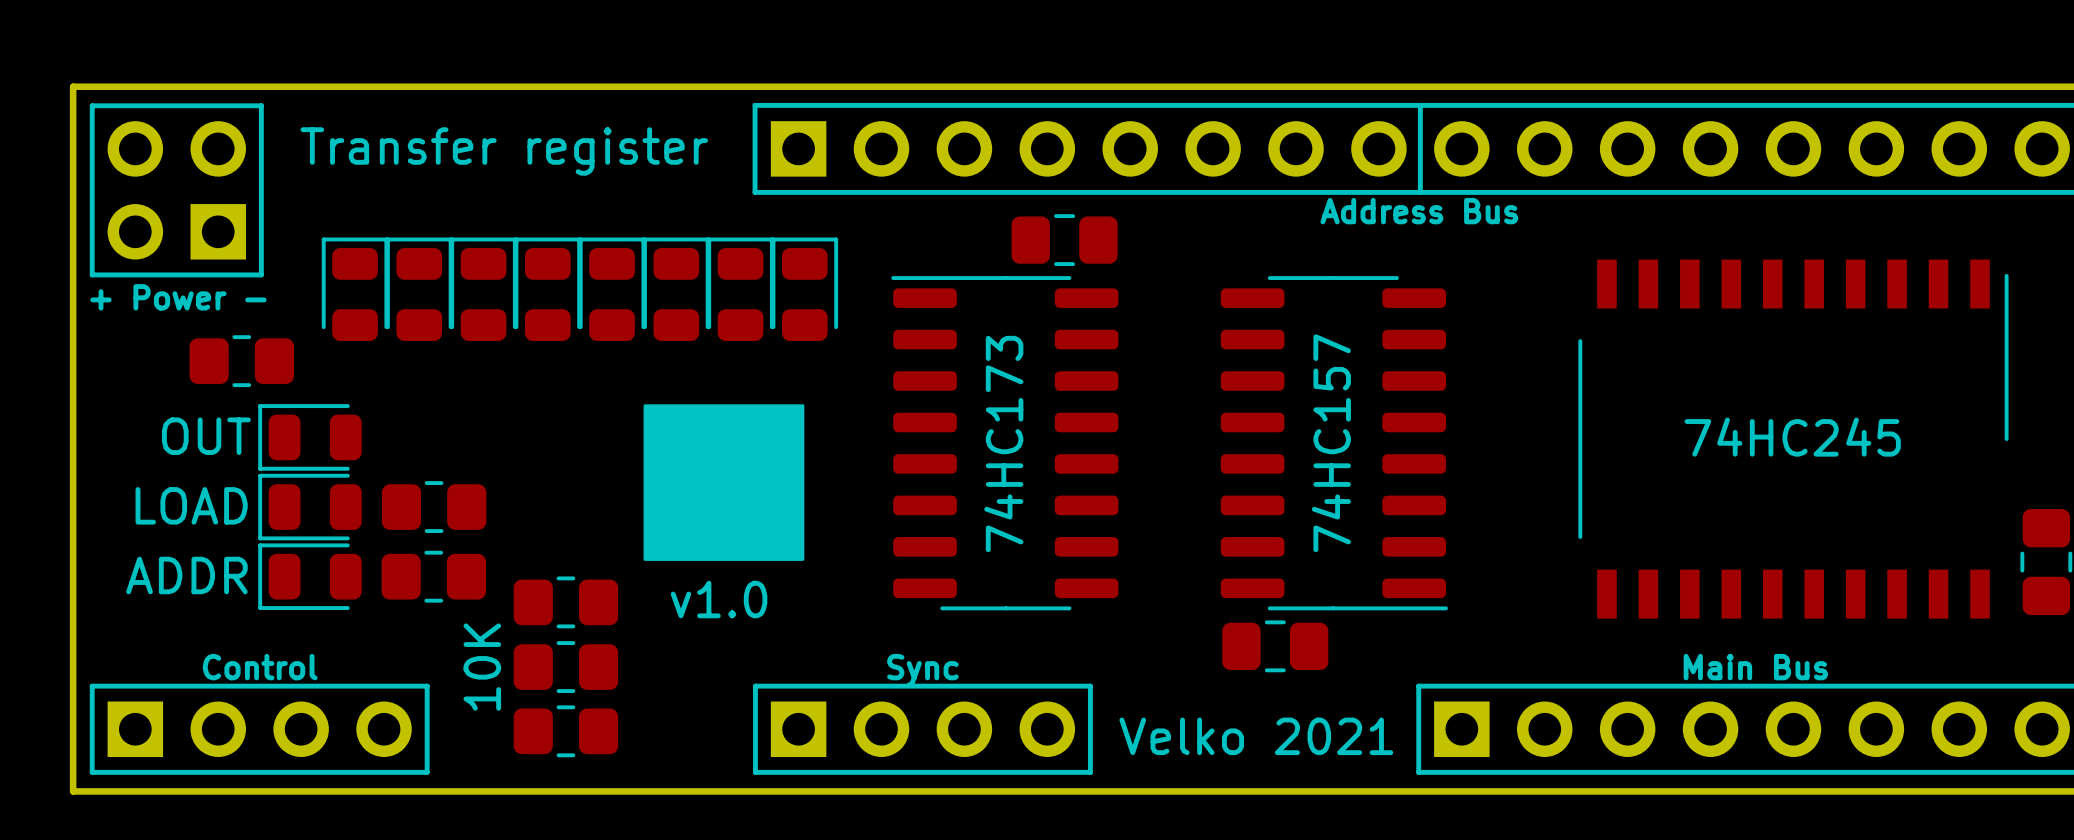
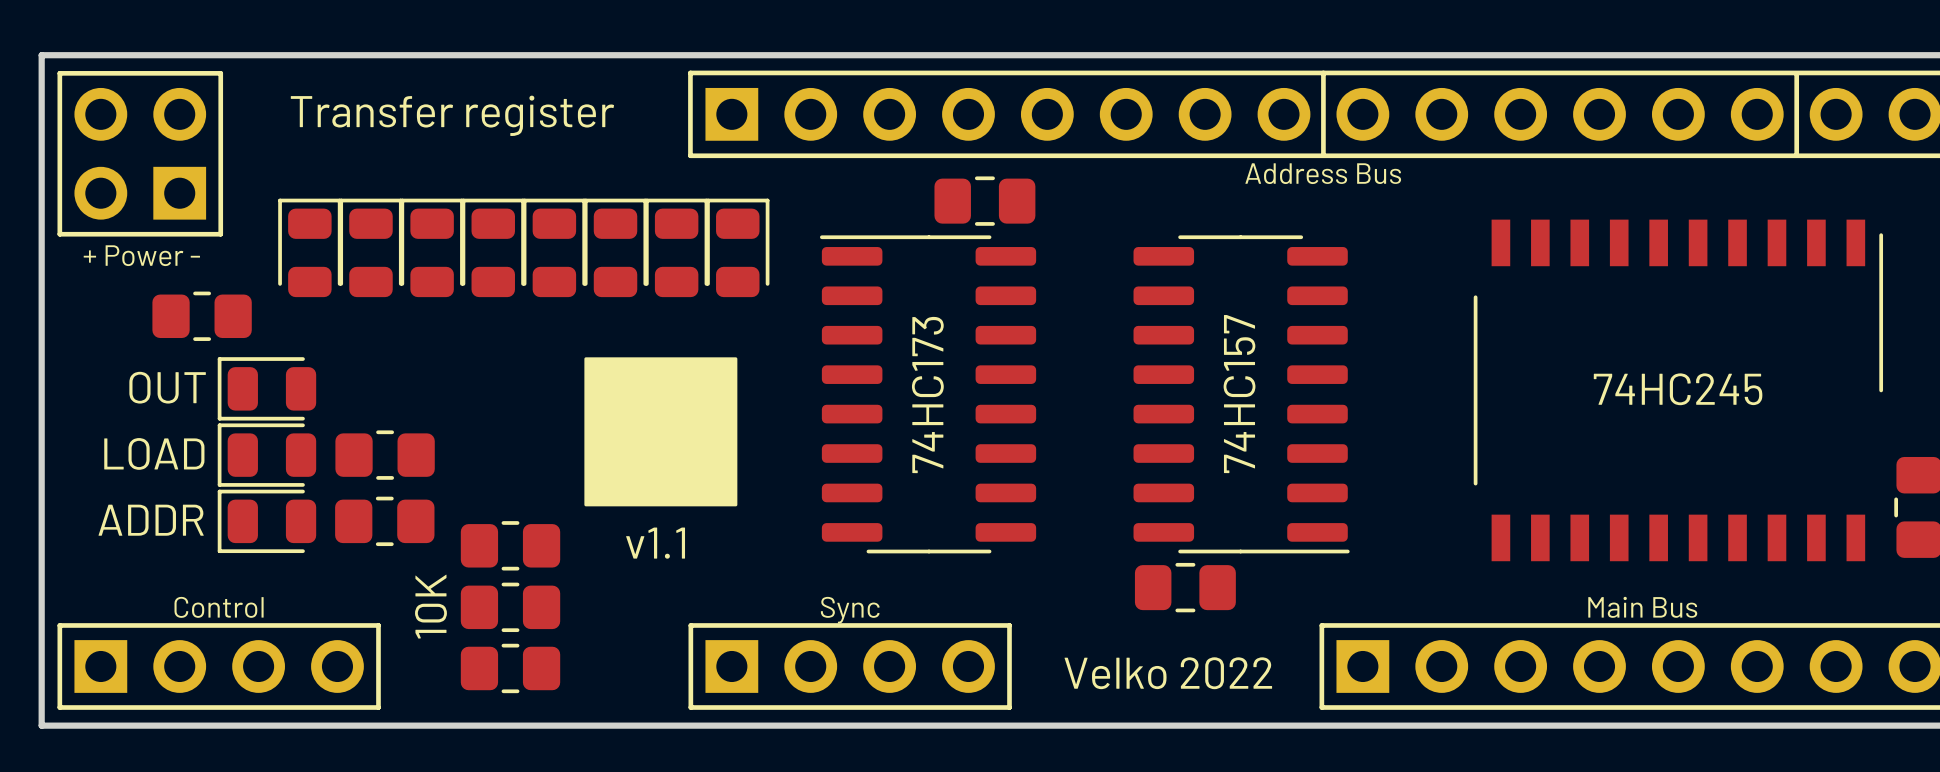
line: none -> (1796, 74) (1796, 153)
text: v1.0 (719, 599) -> v1.1 (655, 543)
text: Velko 2021 (1256, 736) -> Velko 2022 (1168, 673)

